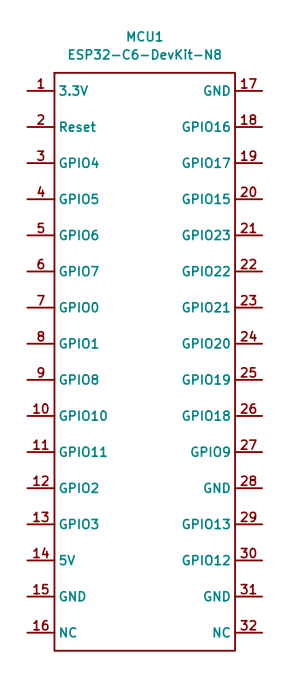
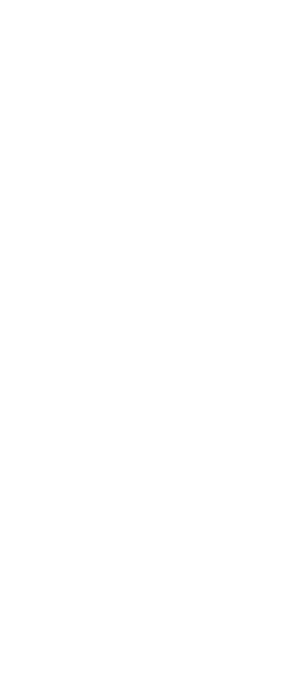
MCU1: ESP32-C6-DevKit-N8 (144, 361) -> none

